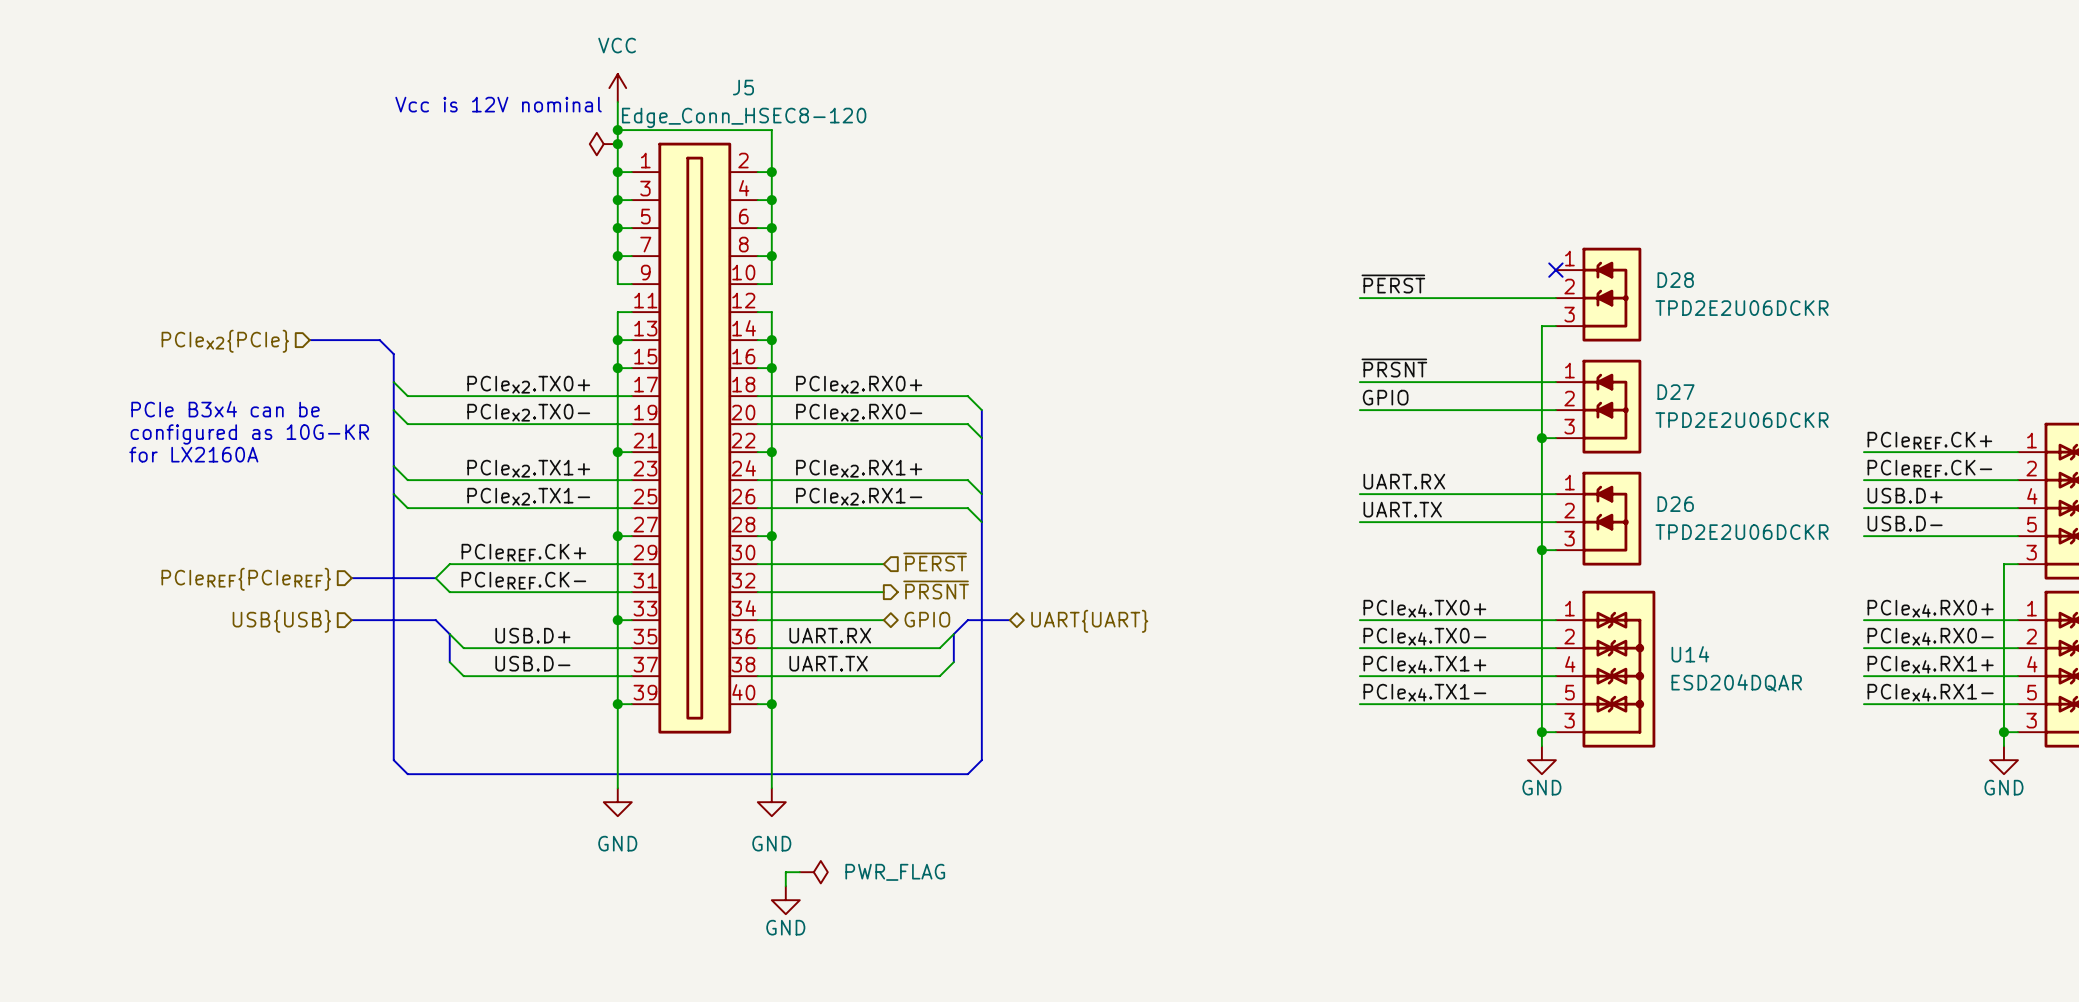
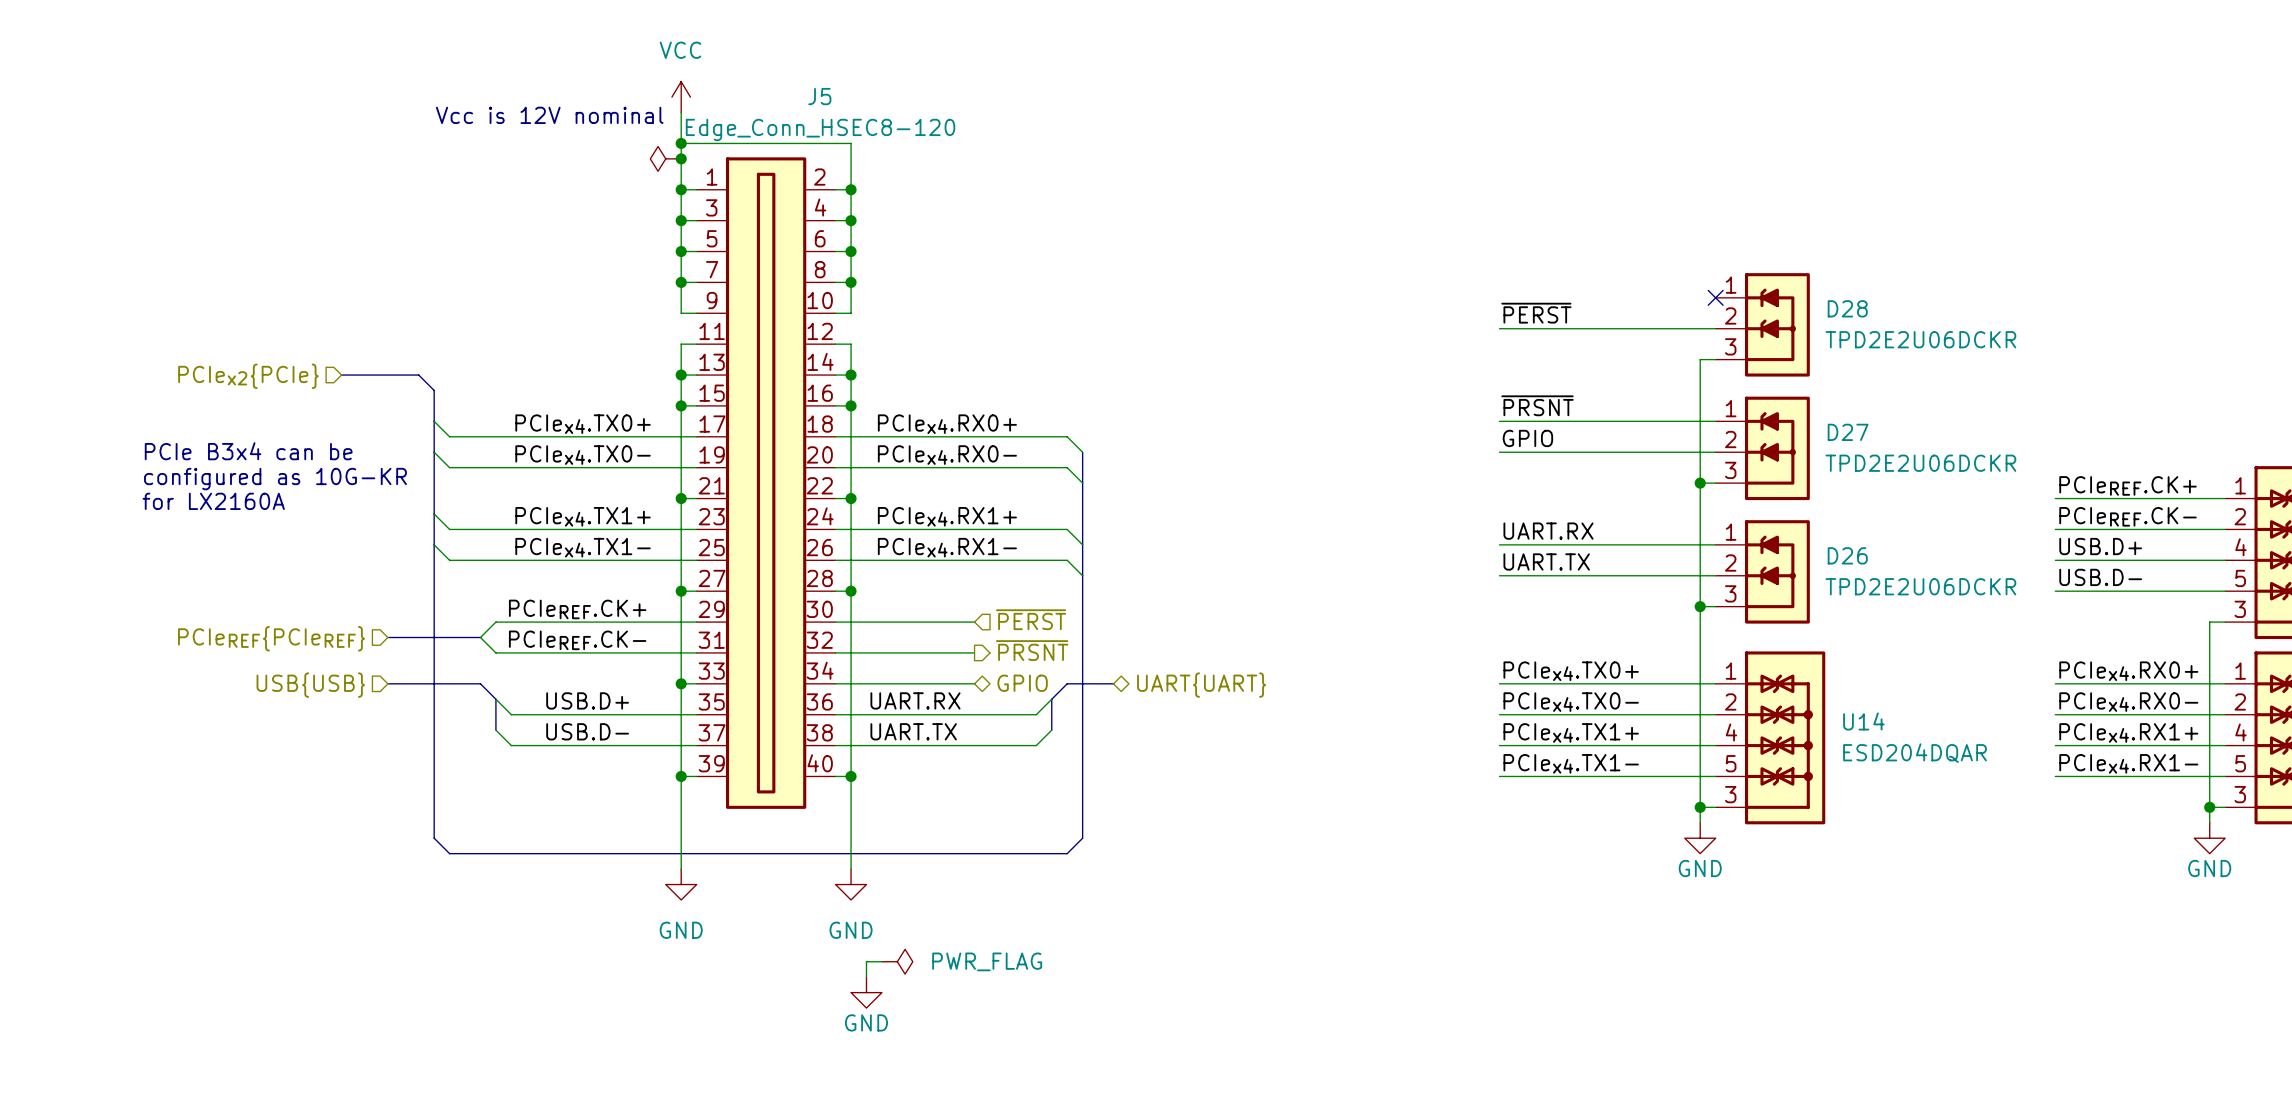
label: PCIex2.TX0+ (528, 384) -> PCIex4.TX0+ (583, 424)
label: PCIex2.RX0+ (859, 384) -> PCIex4.RX0+ (947, 424)
label: PCIex2.TX0- (528, 412) -> PCIex4.TX0- (583, 455)
label: PCIex2.RX0- (859, 412) -> PCIex4.RX0- (947, 455)
label: PCIex2.TX1+ (528, 468) -> PCIex4.TX1+ (583, 516)
label: PCIex2.RX1+ (859, 468) -> PCIex4.RX1+ (947, 516)
label: PCIex2.TX1- (528, 496) -> PCIex4.TX1- (583, 547)
label: PCIex2.RX1- (859, 496) -> PCIex4.RX1- (947, 547)

